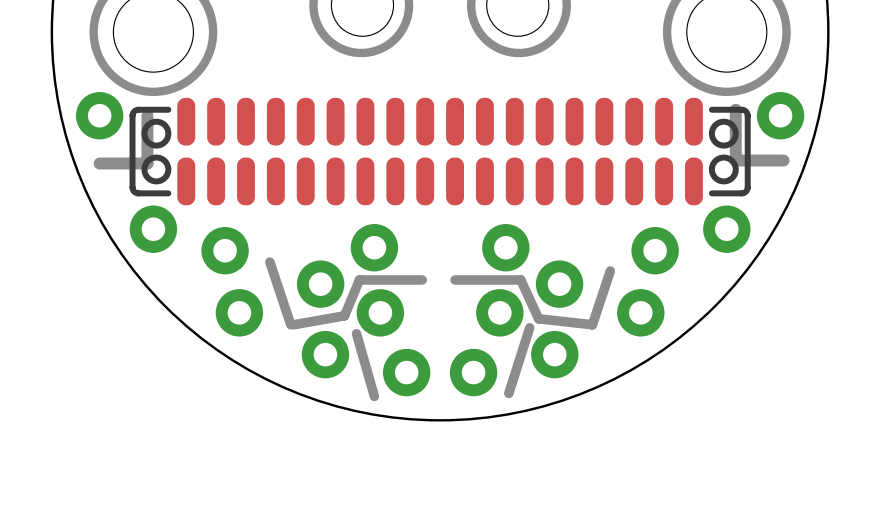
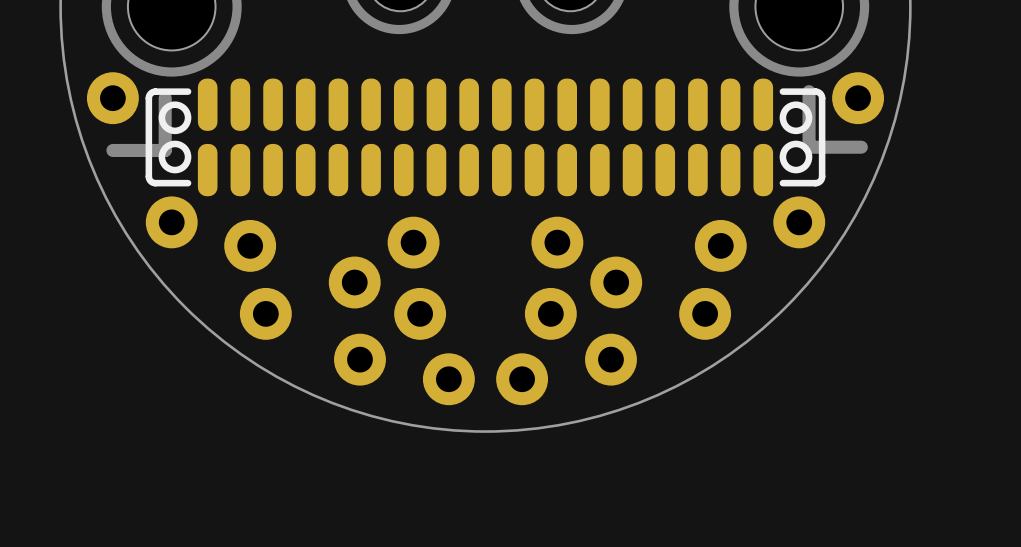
line: (269, 262) (290, 324) -> none
line: (610, 271) (592, 324) (538, 318) (520, 279) (455, 279) -> none
line: (422, 279) (359, 279) (344, 315) (293, 324) -> none
line: (529, 327) (508, 393) -> none
line: (356, 333) (374, 396) -> none

